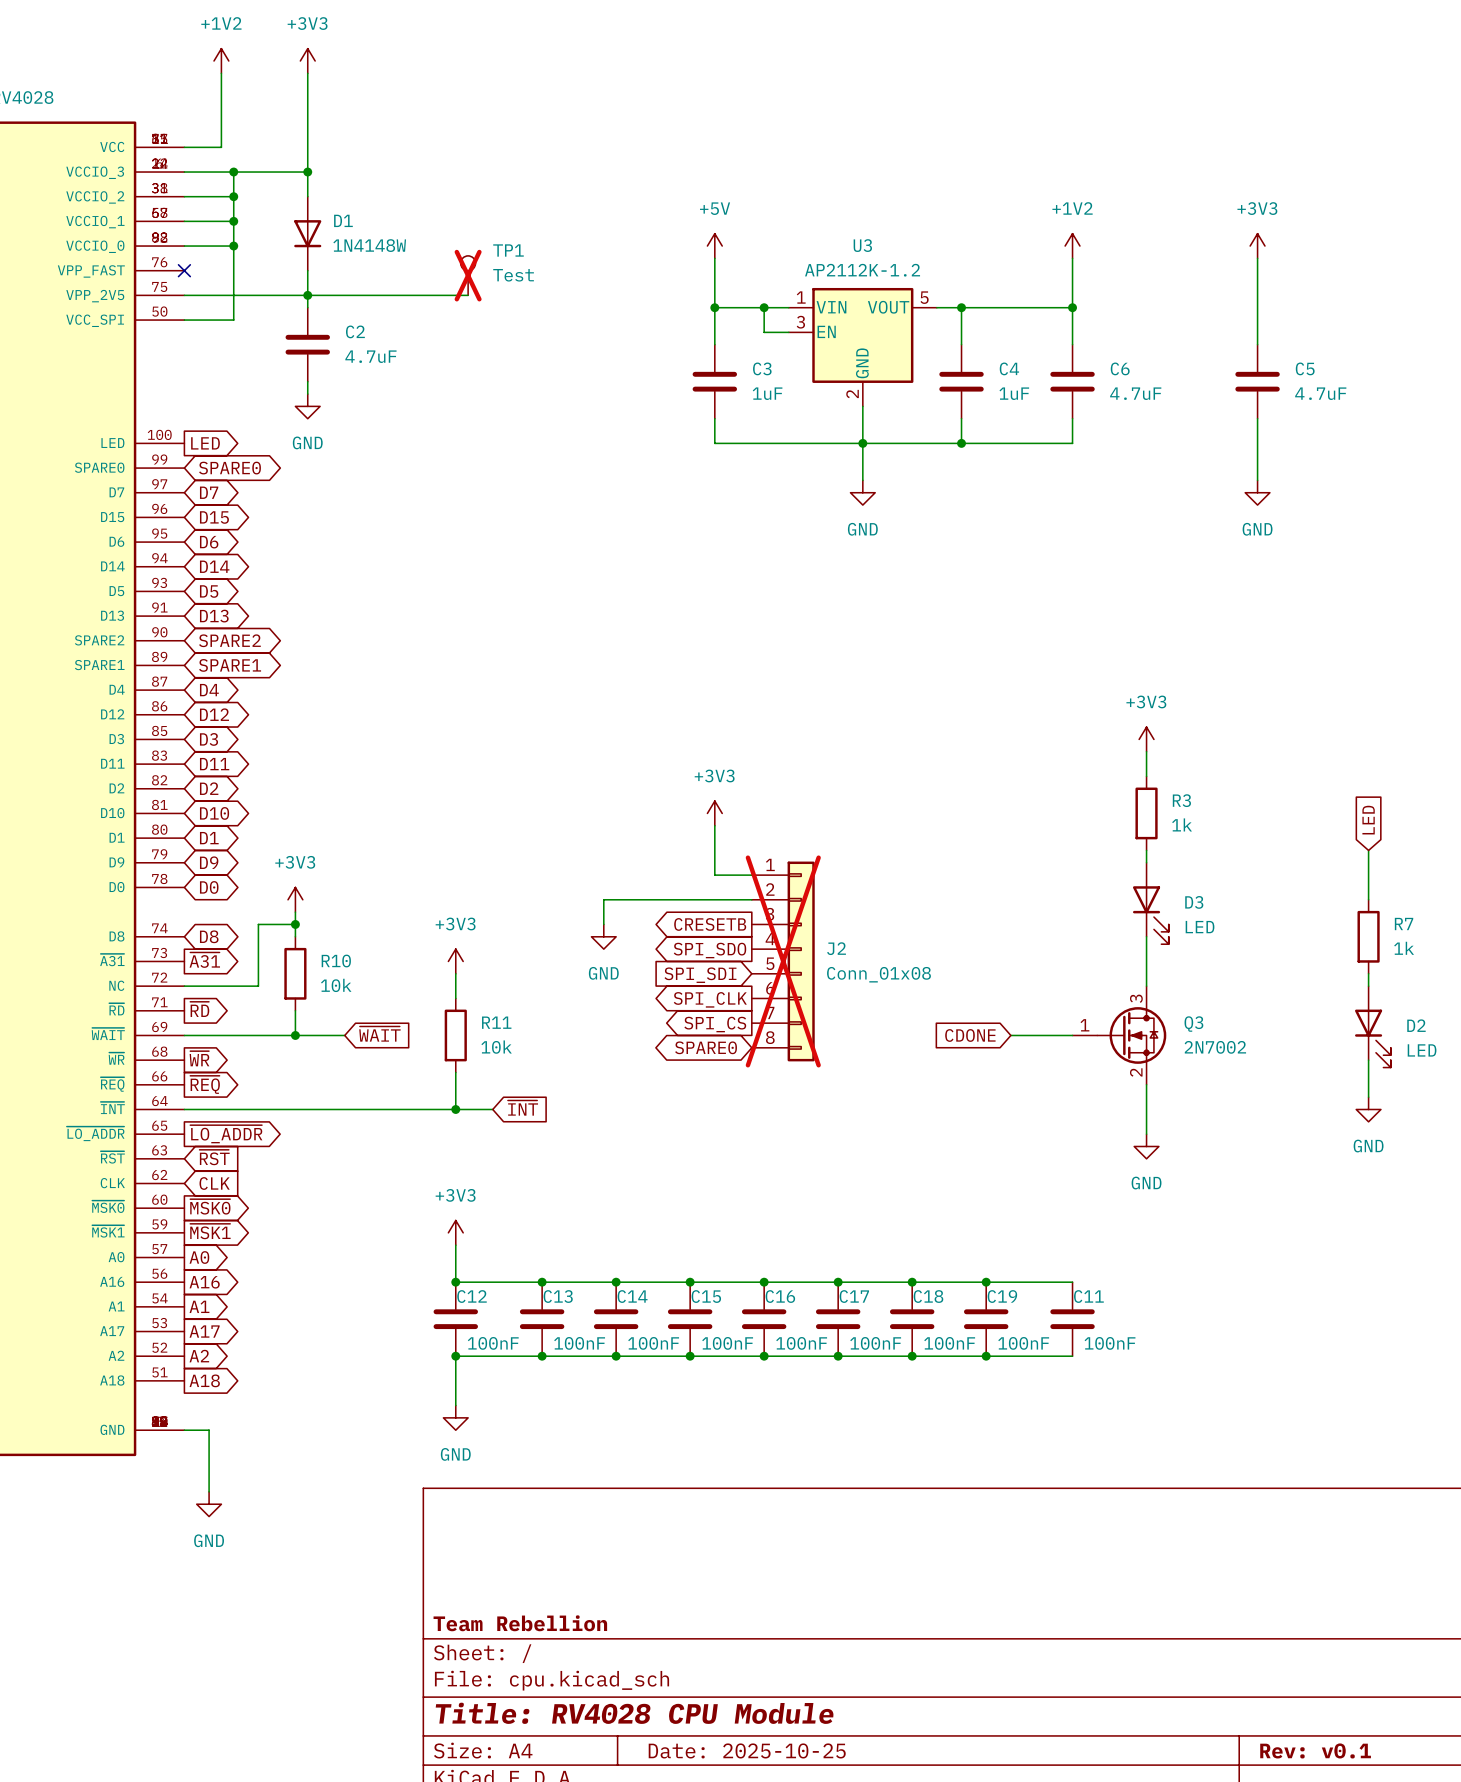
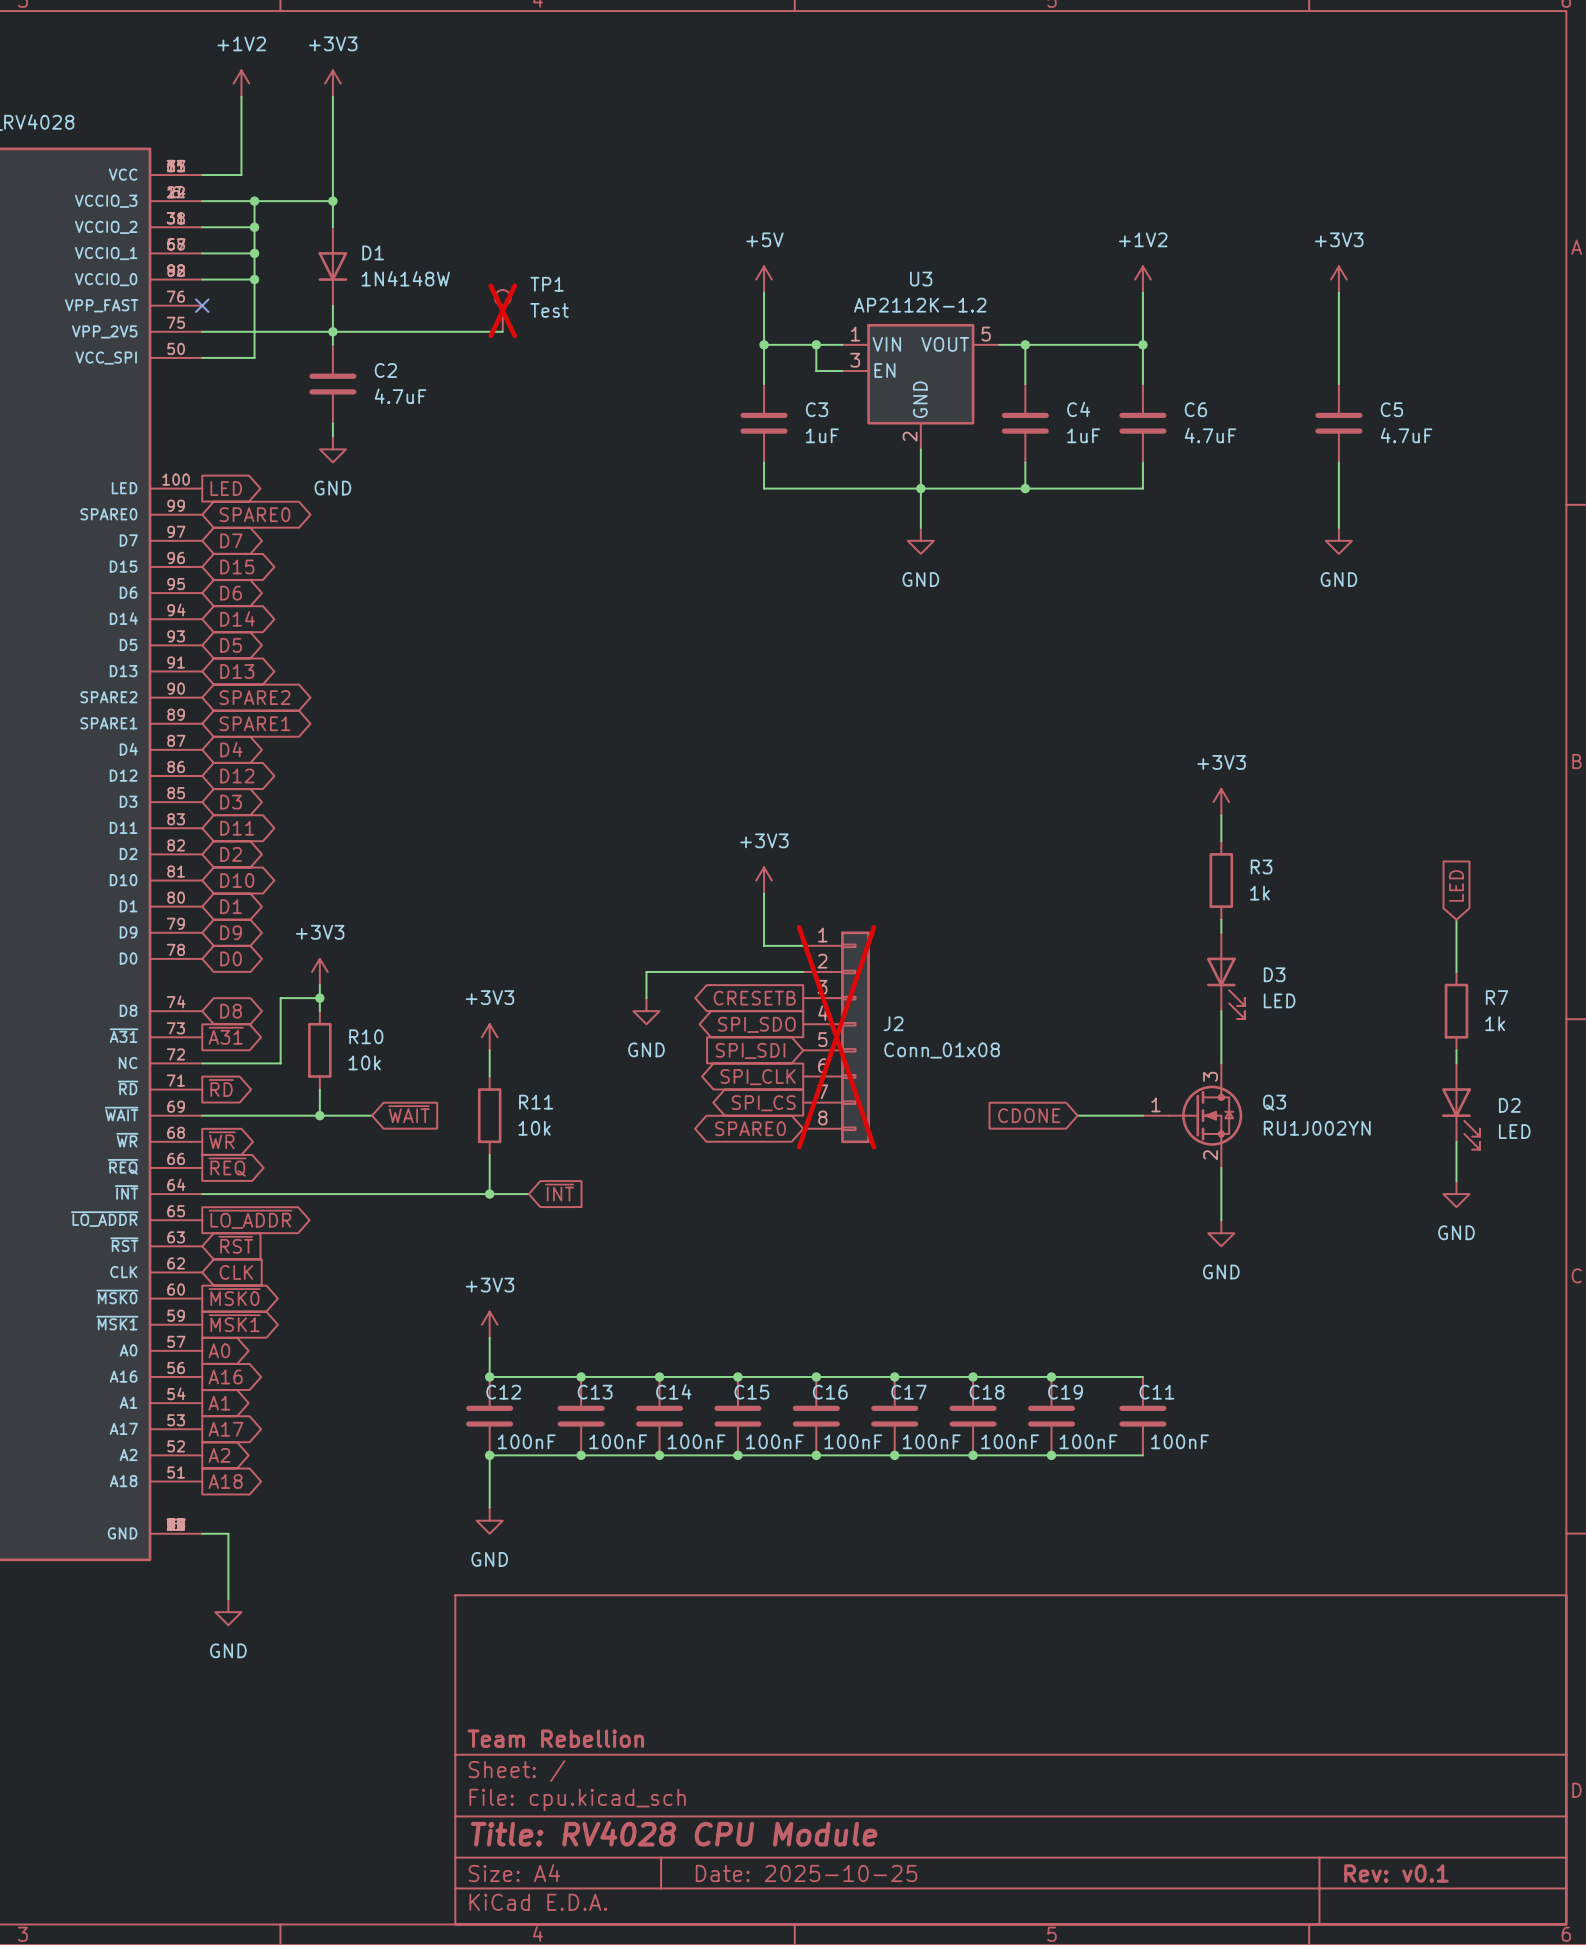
Q3 value: 2N7002 (1215, 1047) -> RU1J002YN (1317, 1128)

